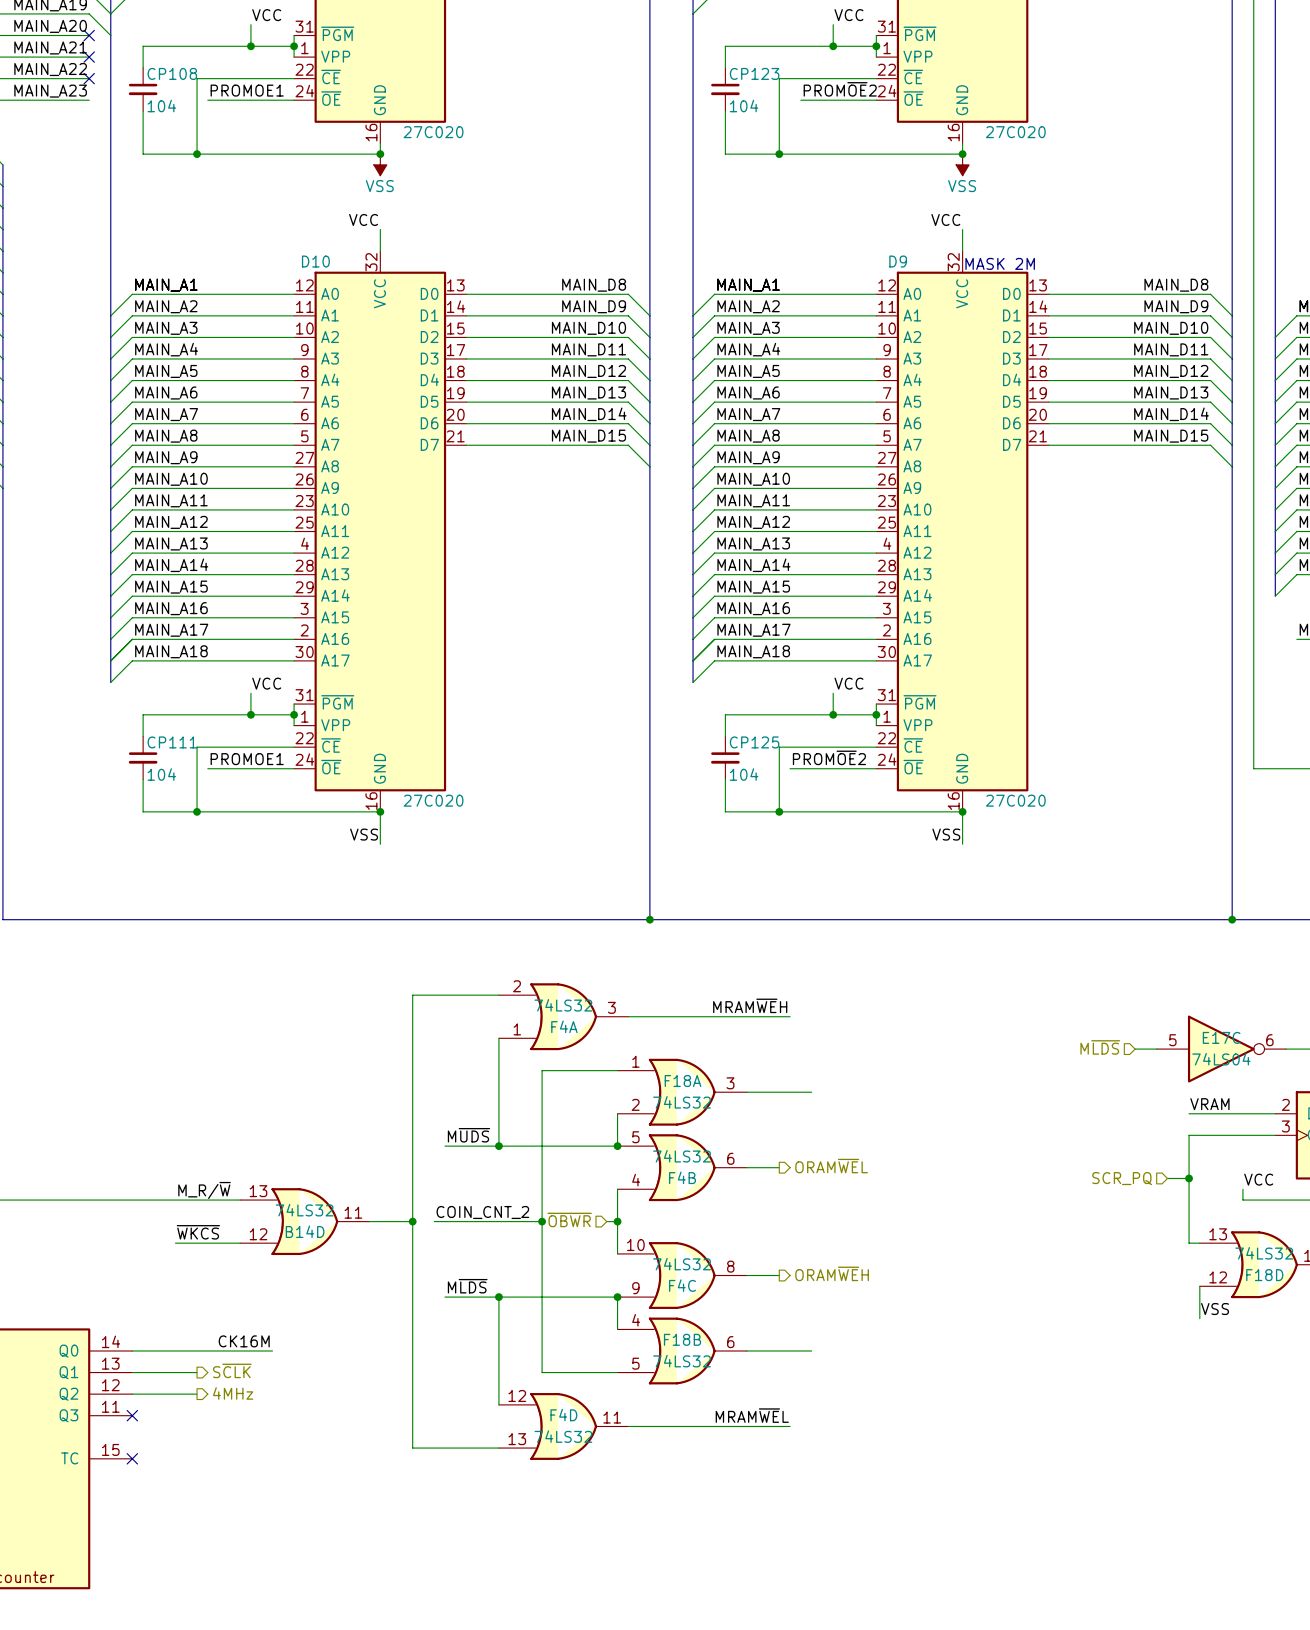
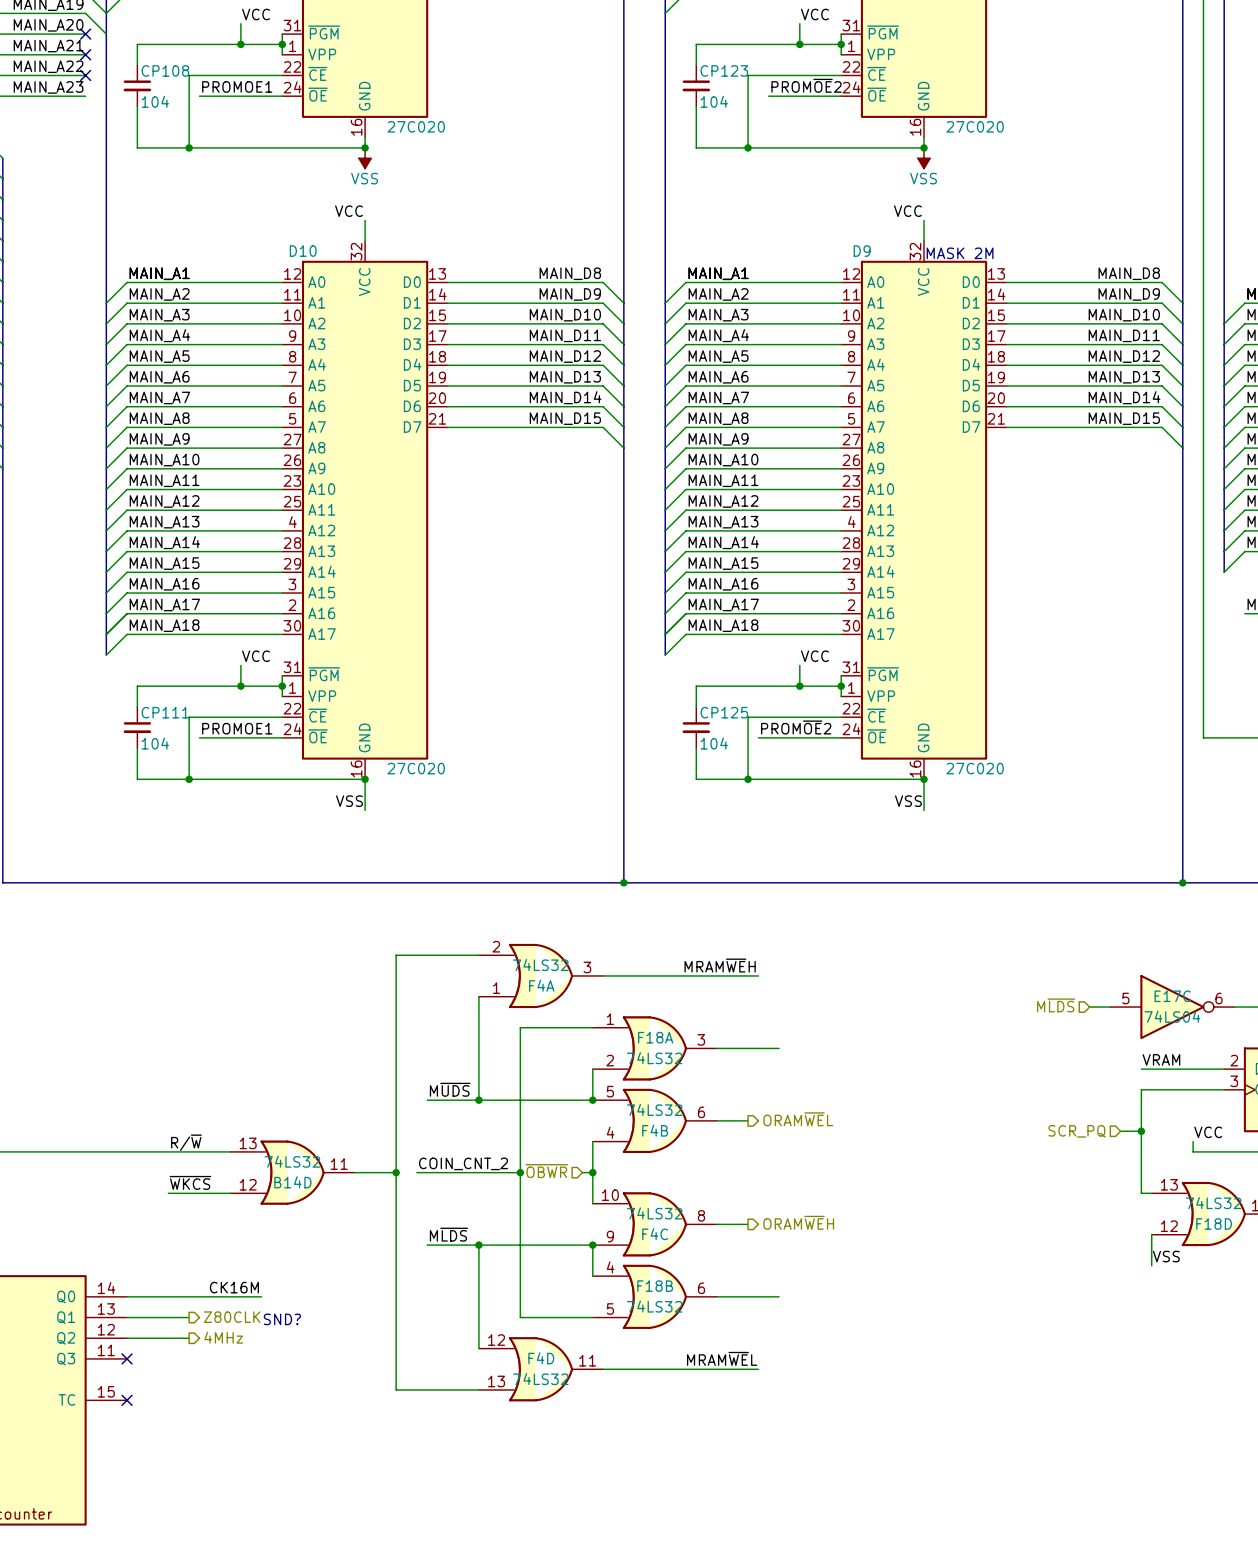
label: M_R/~{W} (204, 1190) -> R/~{W} (186, 1142)
hierarchical label: S~{CLK} (232, 1370) -> Z80CLK (232, 1317)
text: none -> SND? (282, 1319)

